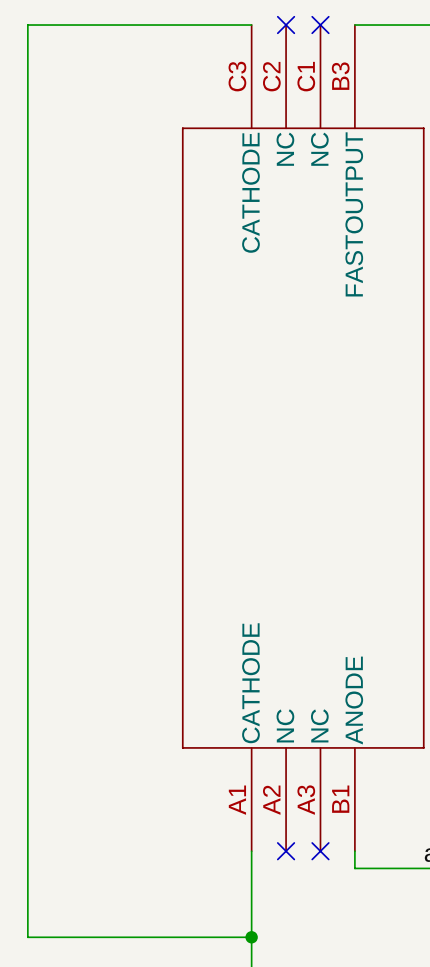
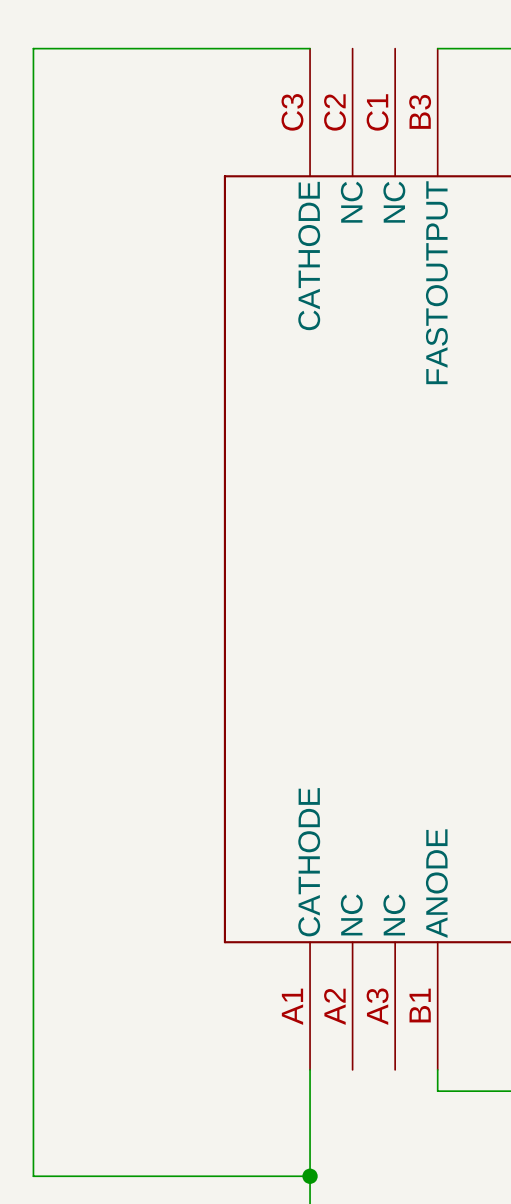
no-connect mark: (286, 25) -> none
no-connect mark: (320, 25) -> none
no-connect mark: (286, 851) -> none
no-connect mark: (320, 851) -> none

